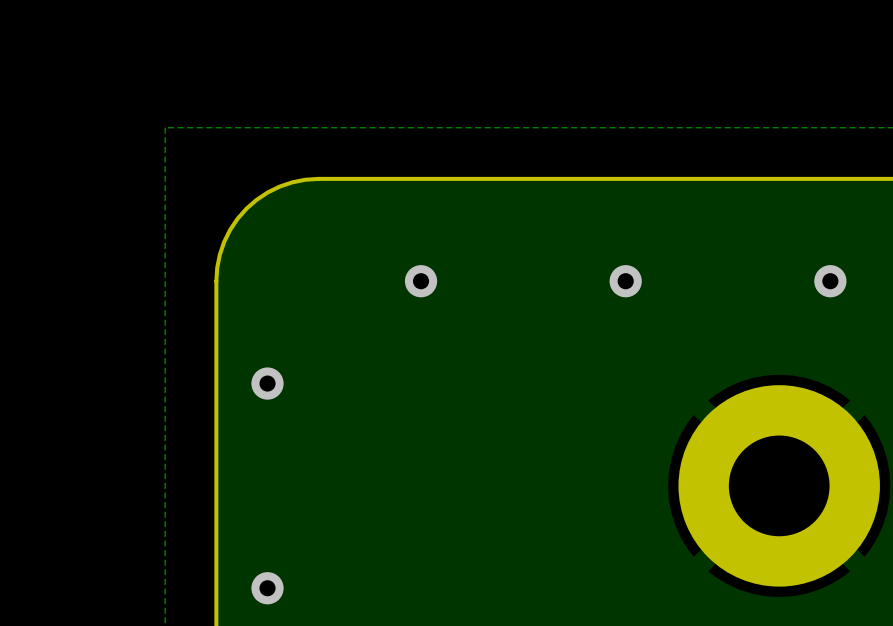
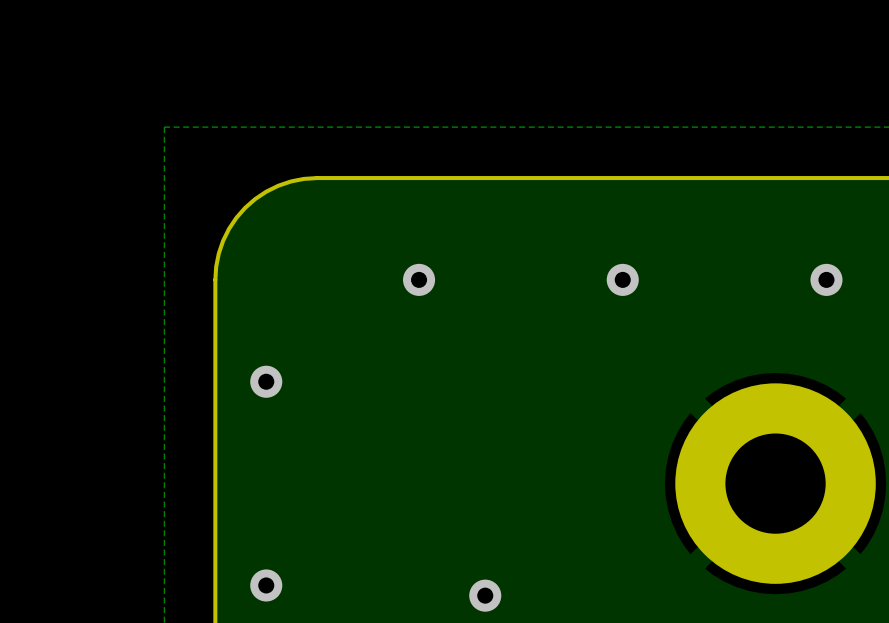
via: none -> (485, 595)

